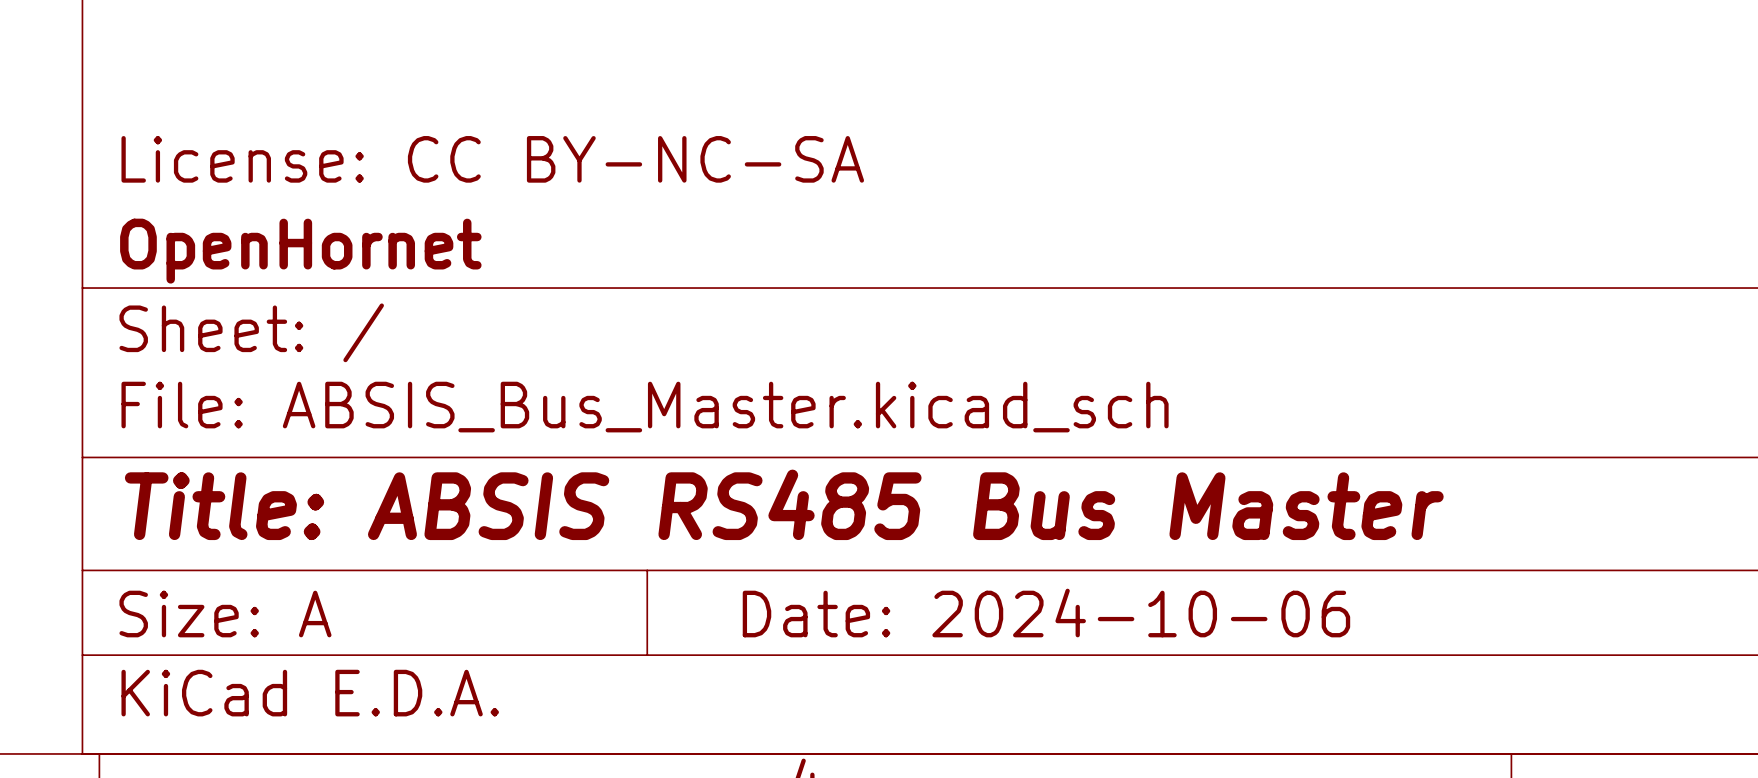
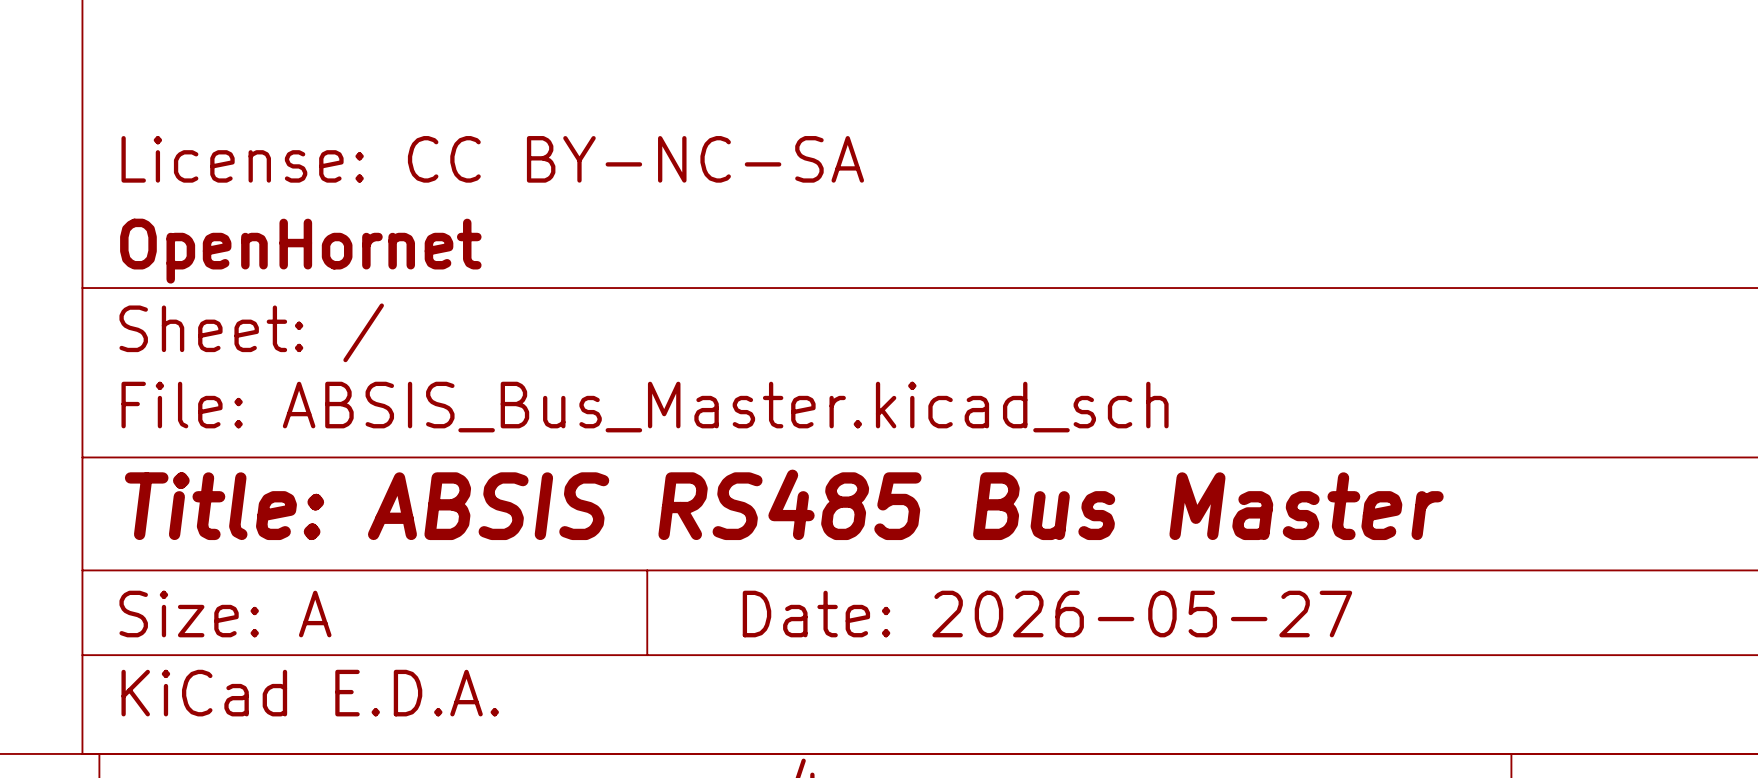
title block: Date: 2024-10-06 (1046, 613) -> Date: 2026-05-27 (1047, 614)

